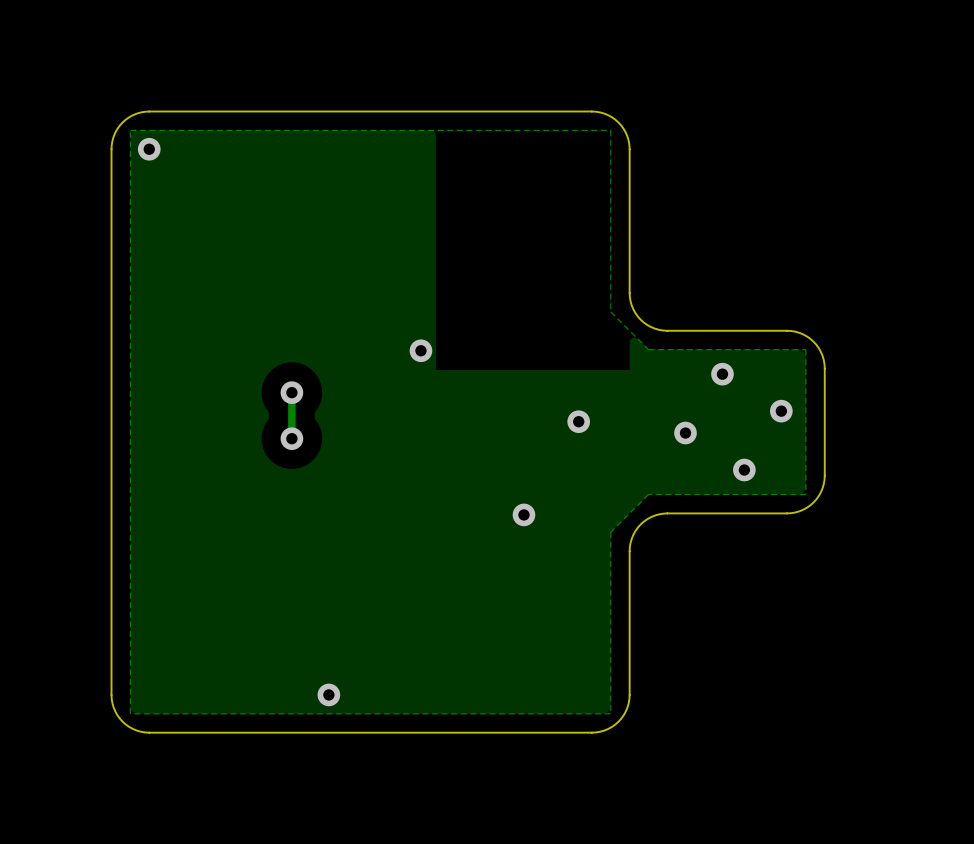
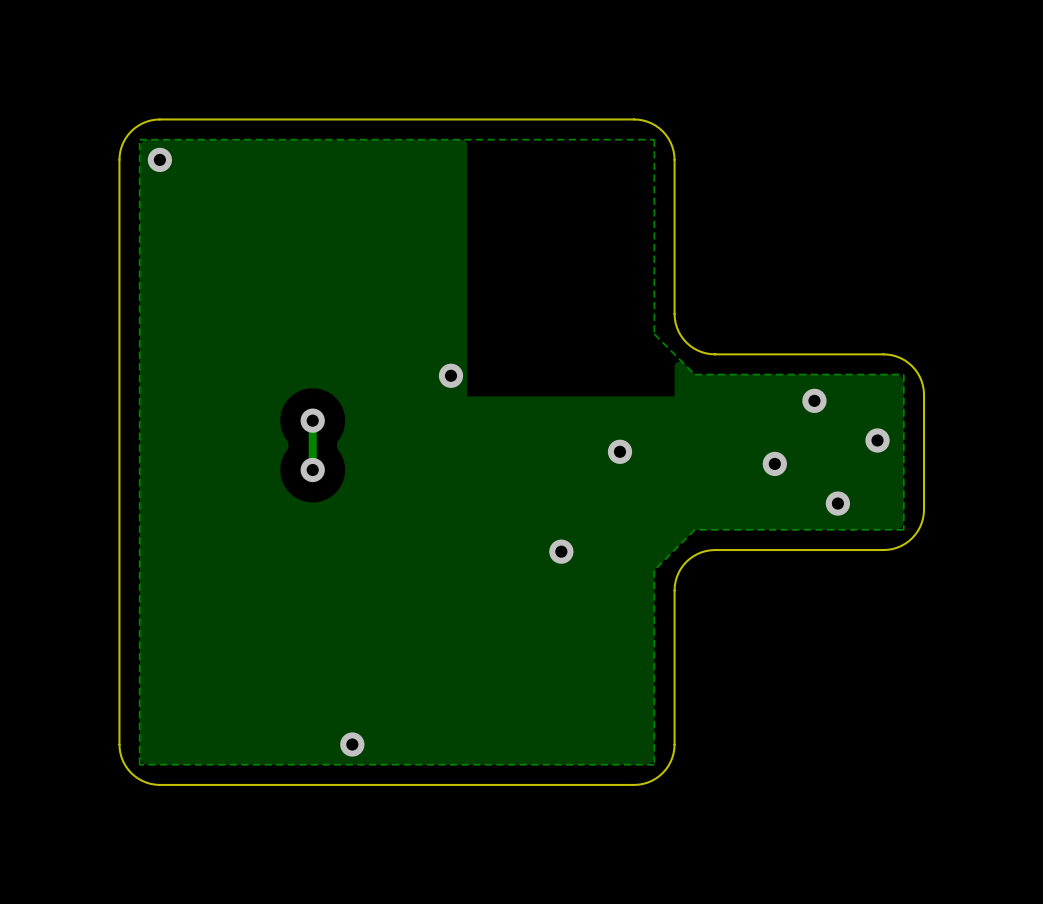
board edge: (787, 330) (803, 334) (813, 341) (822, 356) (824, 368) (823, 484) (818, 495) (810, 505) (799, 511) (787, 513) -> (843, 354) (888, 354) (901, 358) (912, 366) (917, 373) (923, 385) (924, 394) (924, 509) (920, 527) (908, 541) (896, 547) (883, 550) (843, 550)
zone outline: (805, 349) (805, 494) -> (863, 374) (903, 374) (903, 529) (863, 529)
via: (722, 374) -> none
via: none -> (814, 400)
via: (781, 411) -> none
via: none -> (877, 440)
via: (685, 433) -> none
via: none -> (774, 463)
via: (744, 470) -> none
via: none -> (837, 503)

